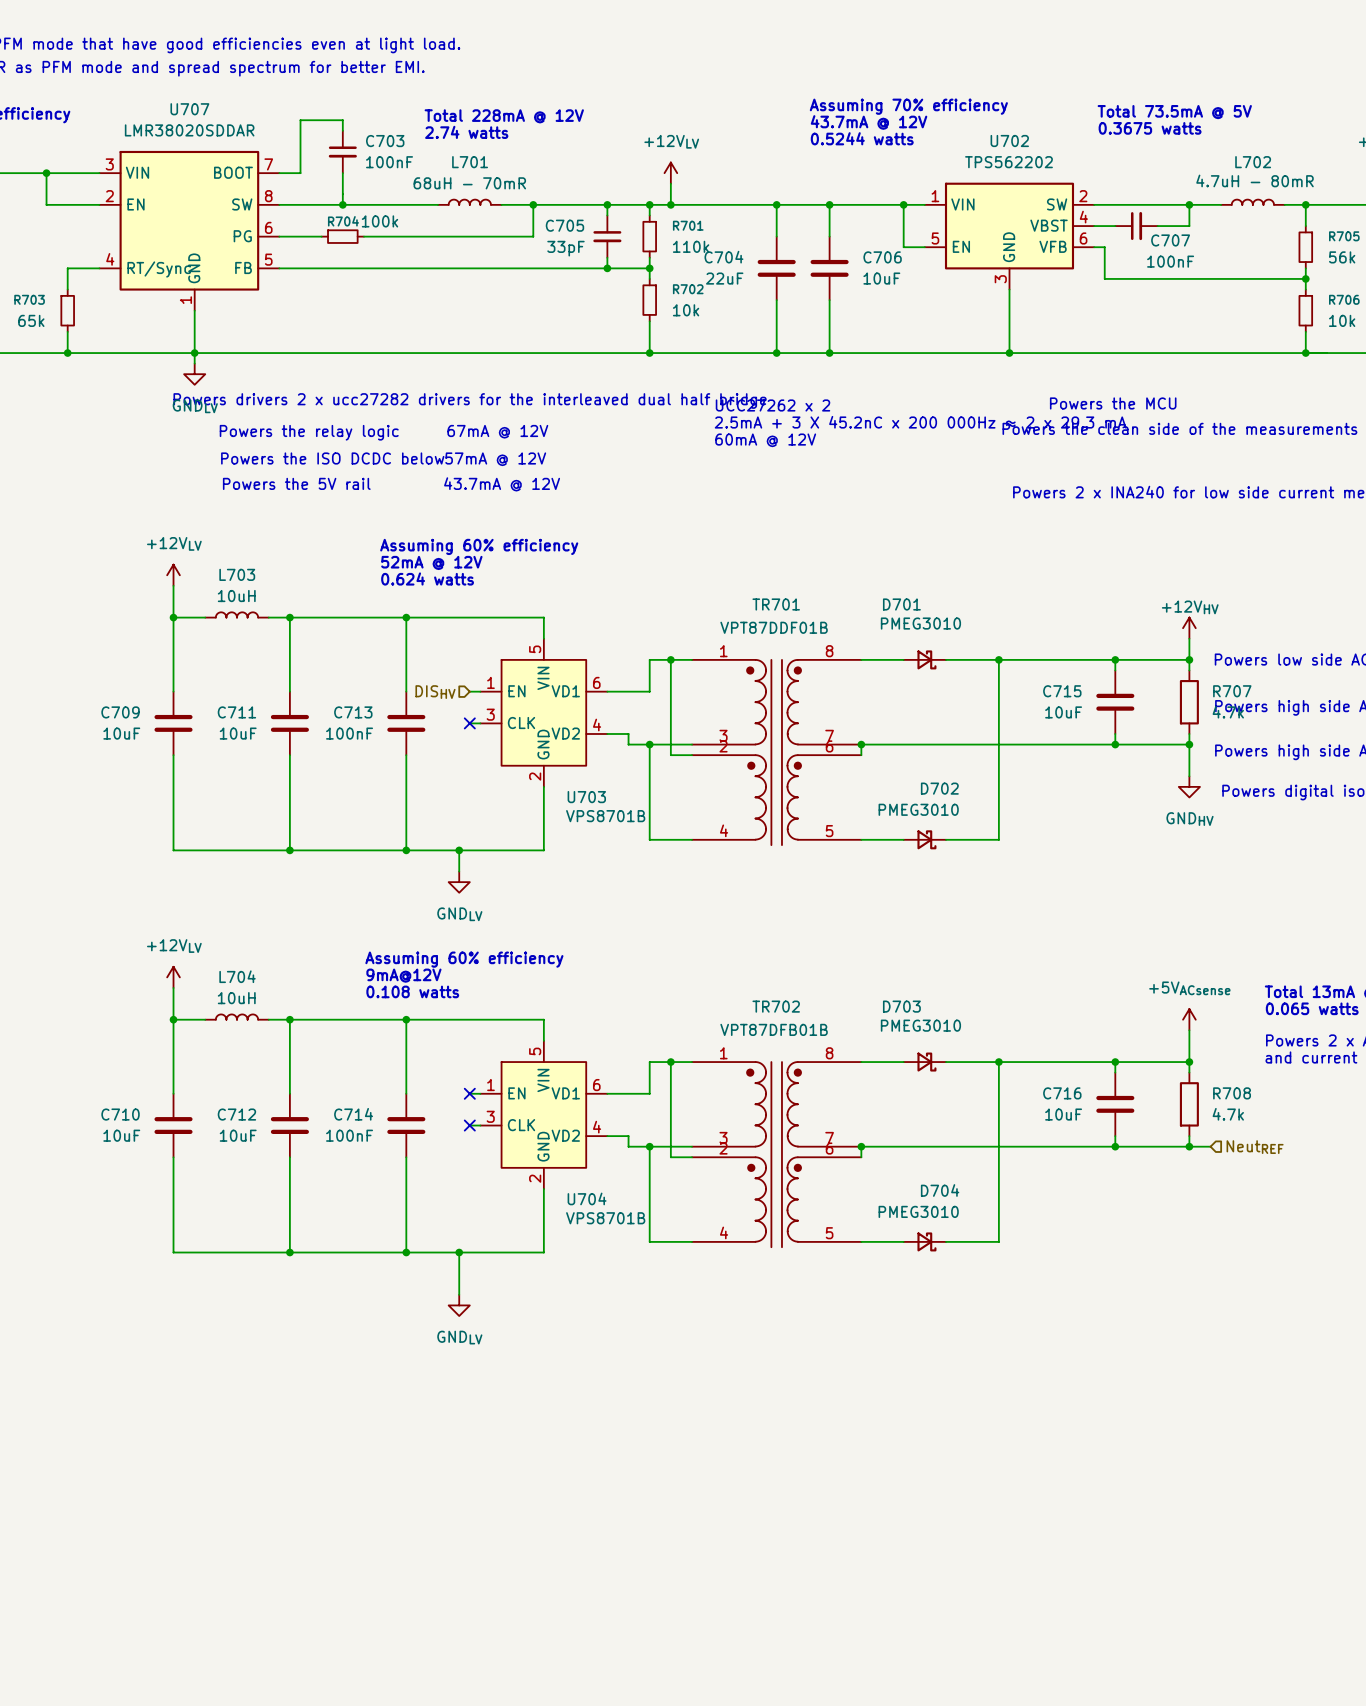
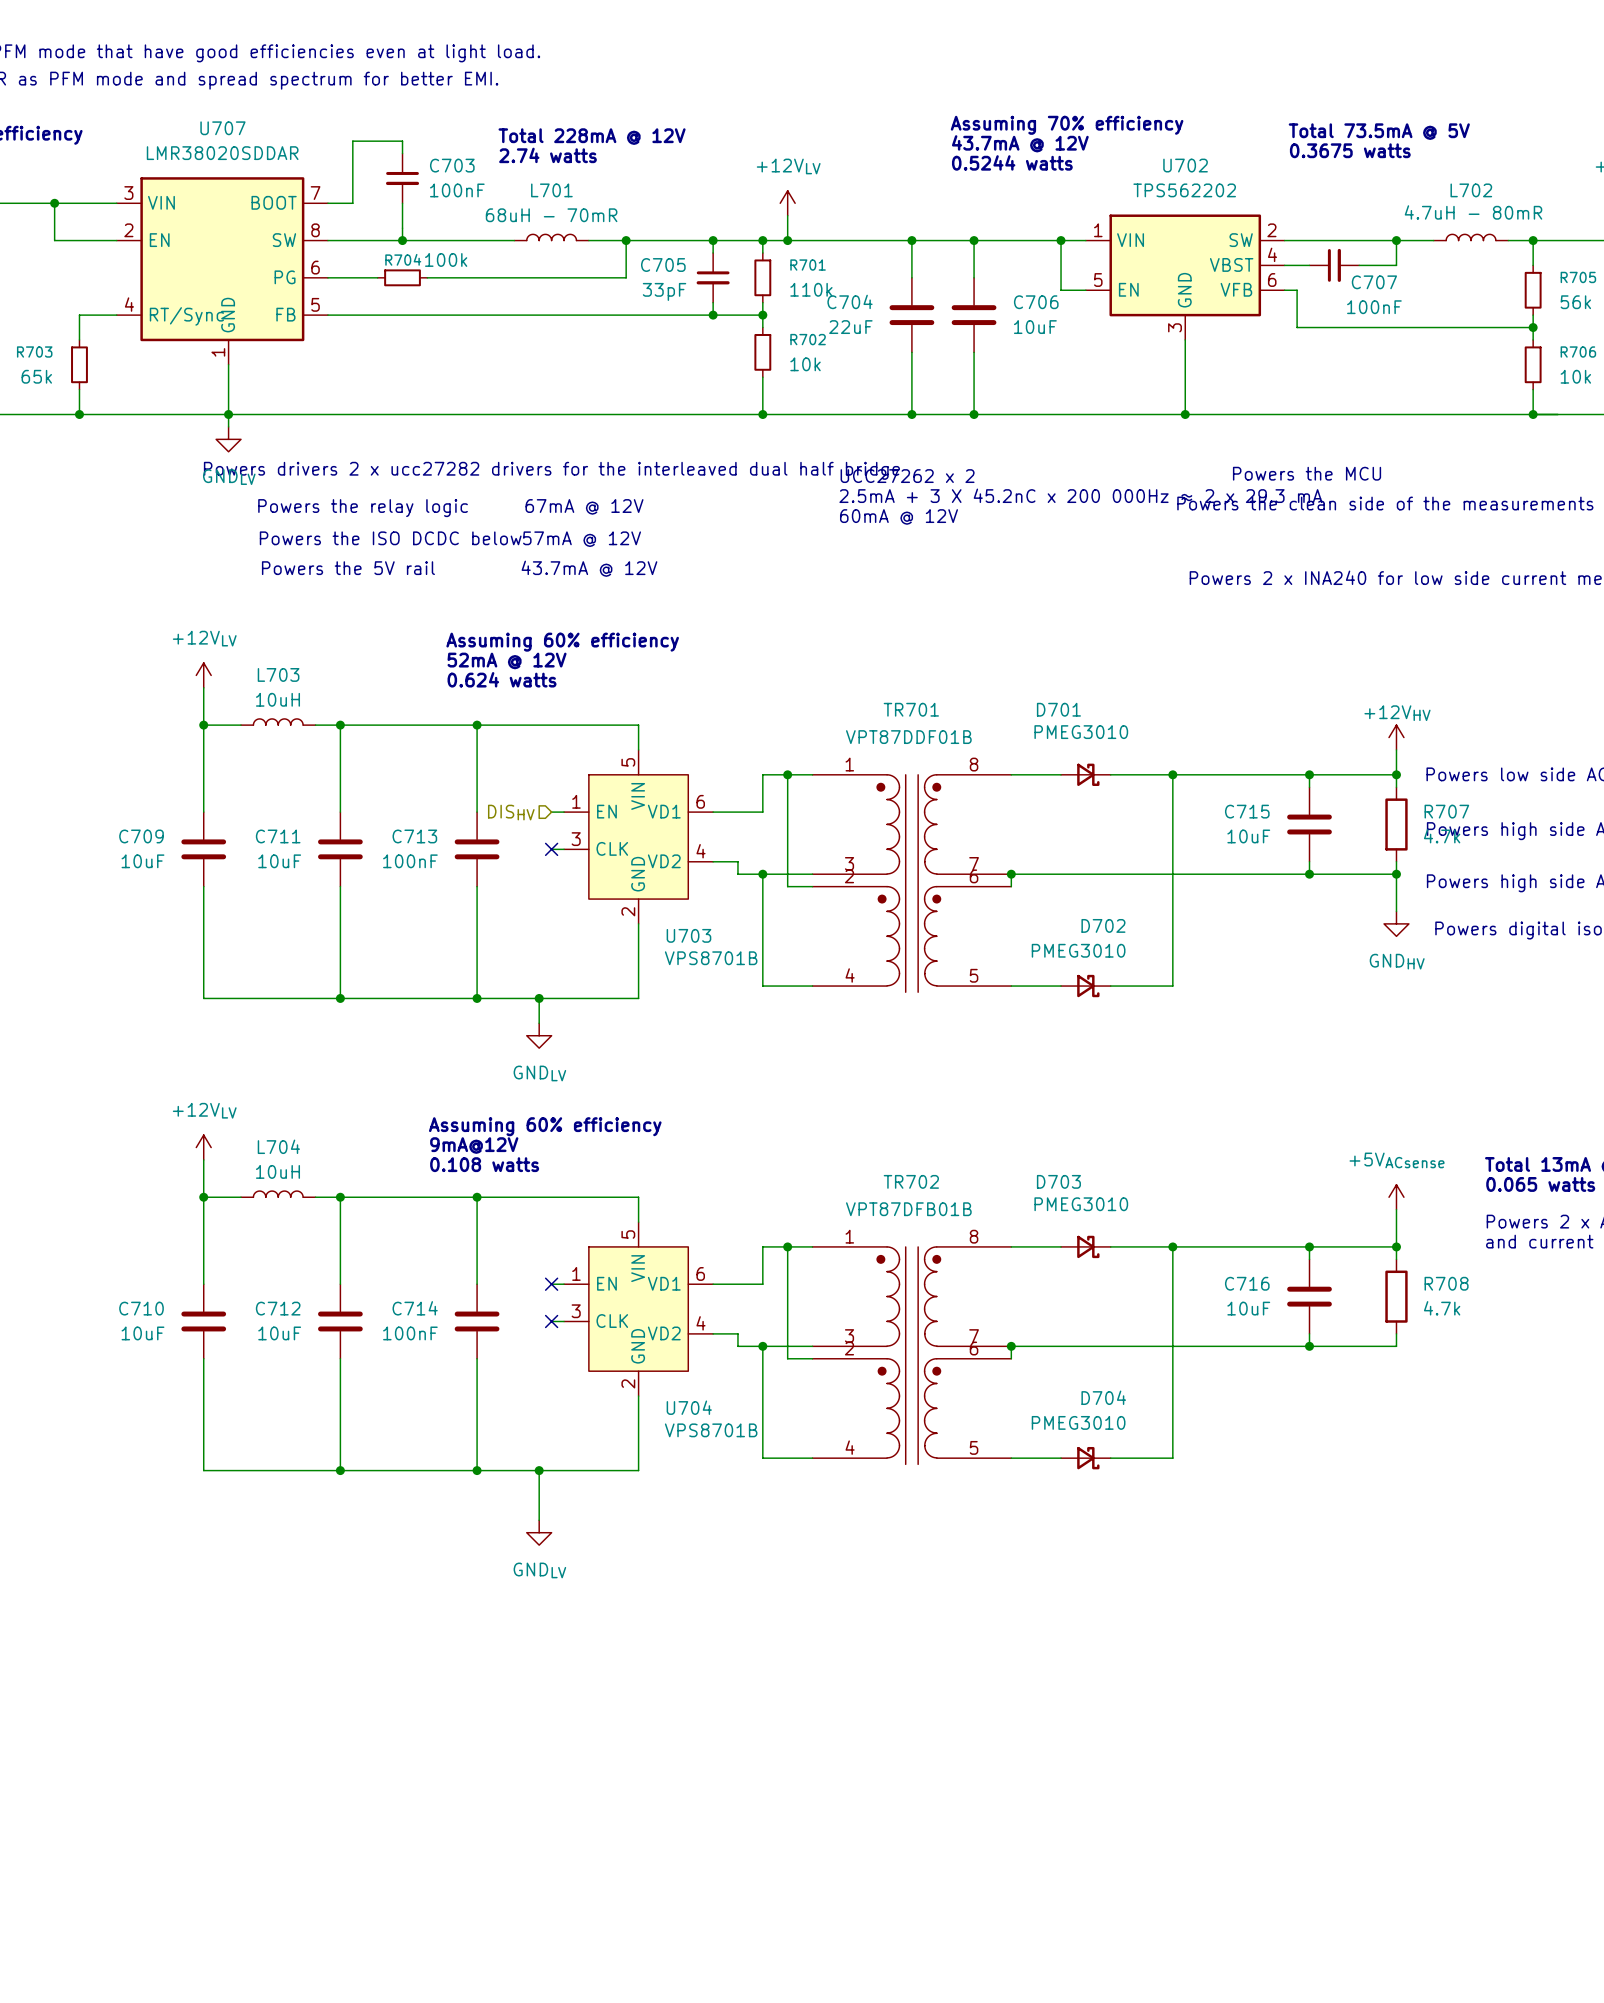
wire: (1189, 1146) (1210, 1146) -> none
junction: (1189, 1146) -> none
hierarchical label: NeutREF (1255, 1147) -> none

